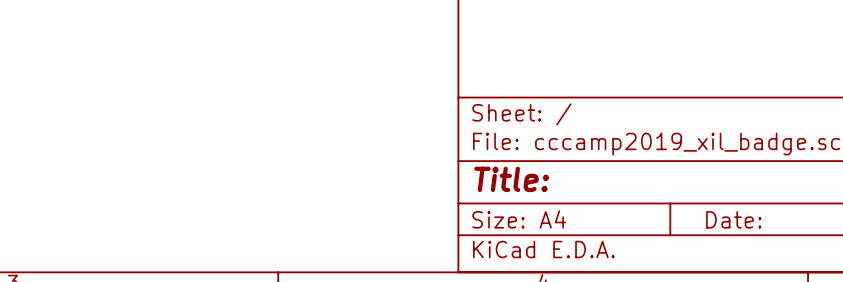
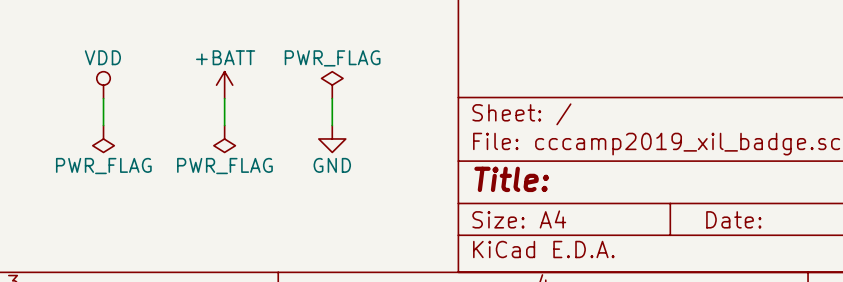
power symbol: none -> VDD (103, 85)
power symbol: none -> +BATT (224, 85)
power symbol: none -> PWR_FLAG (332, 85)
wire: none -> (103, 98) (103, 125)
wire: none -> (224, 98) (224, 125)
wire: none -> (332, 98) (332, 125)
power symbol: none -> PWR_FLAG (103, 138)
power symbol: none -> PWR_FLAG (224, 138)
power symbol: none -> GND (332, 138)

